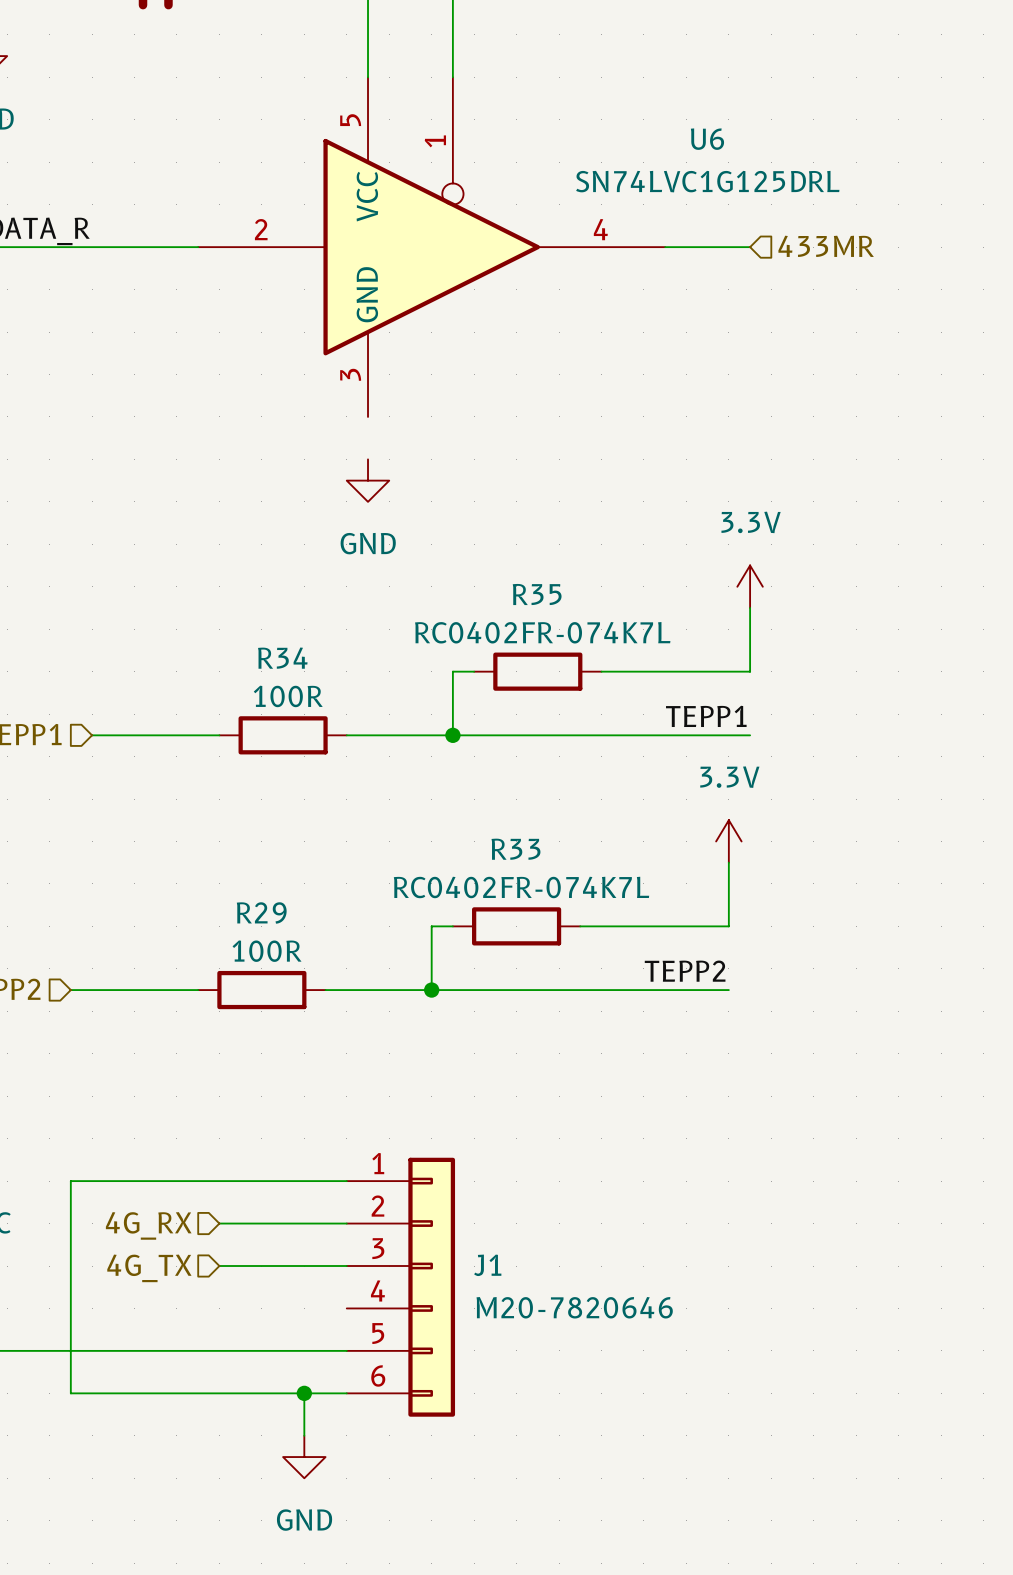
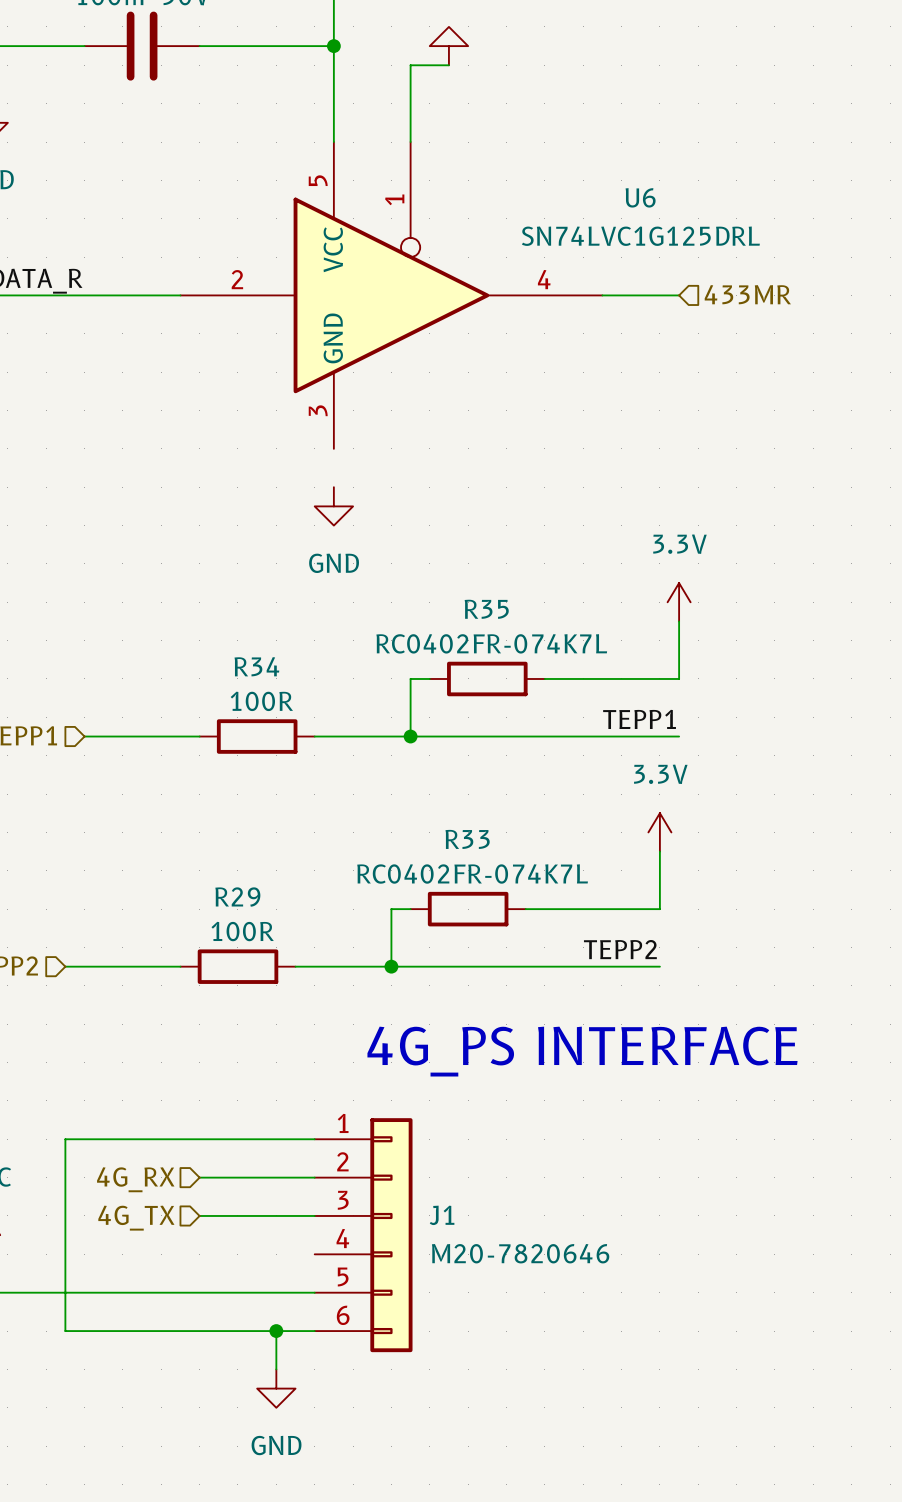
text: none -> 4G_PS INTERFACE (582, 1051)

